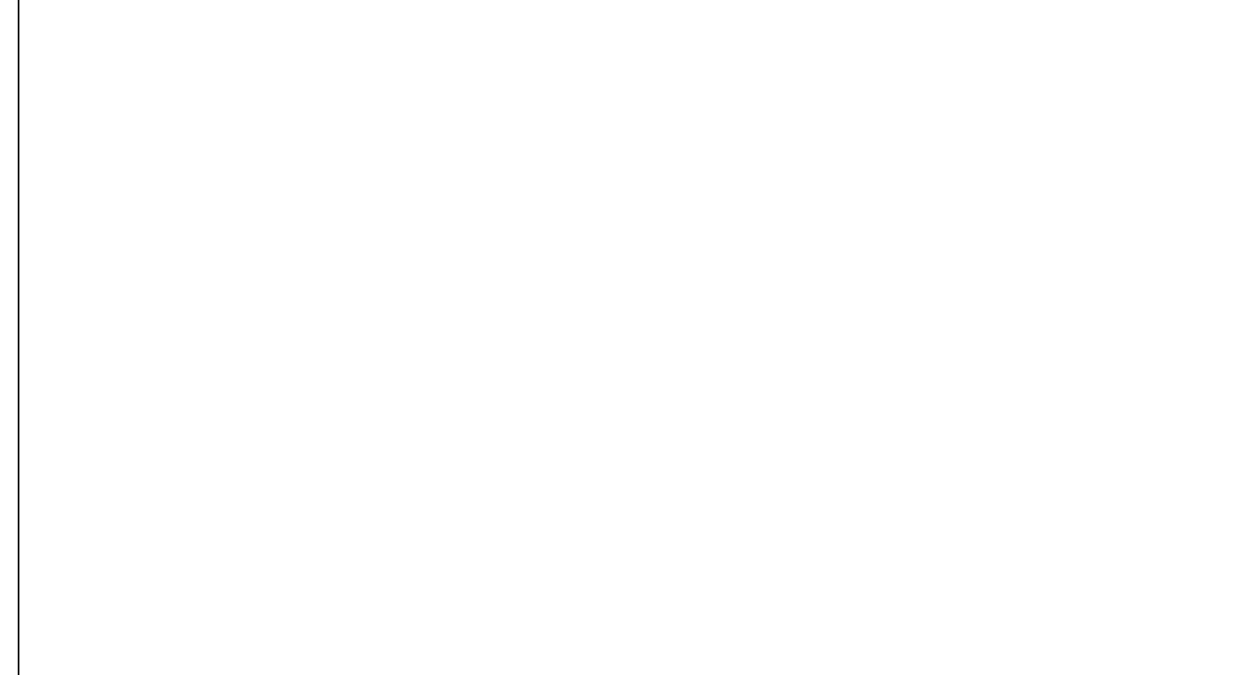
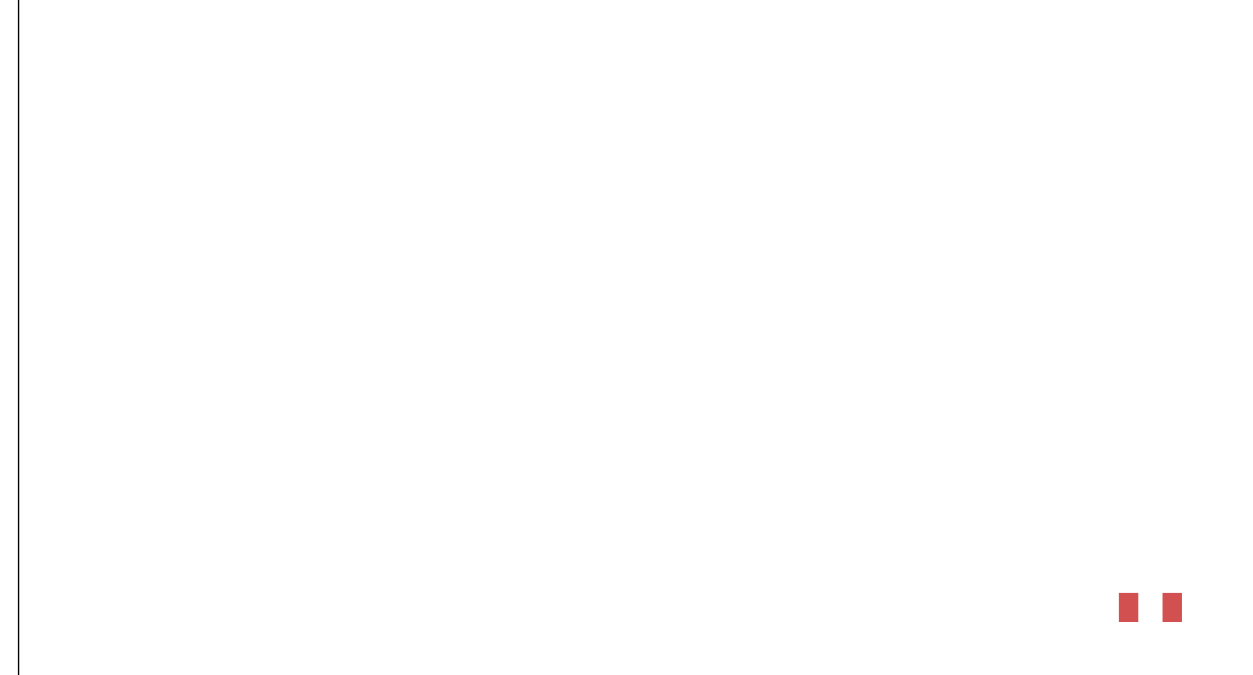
part: none -> (1150, 607)

